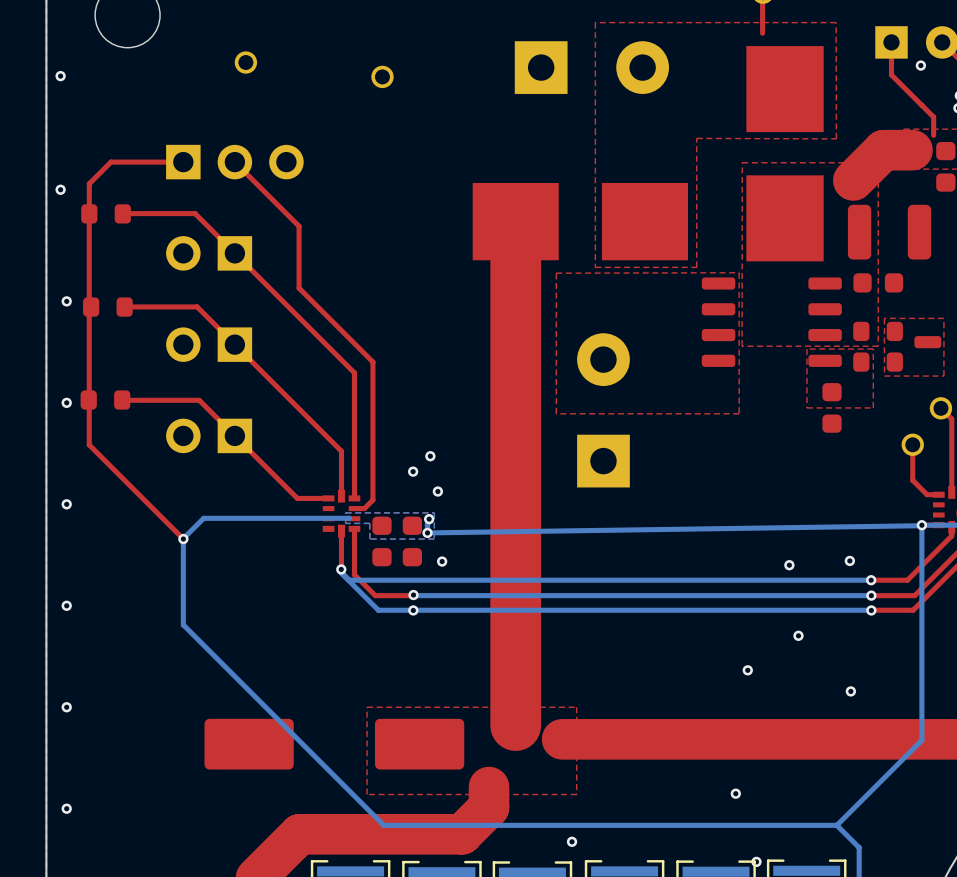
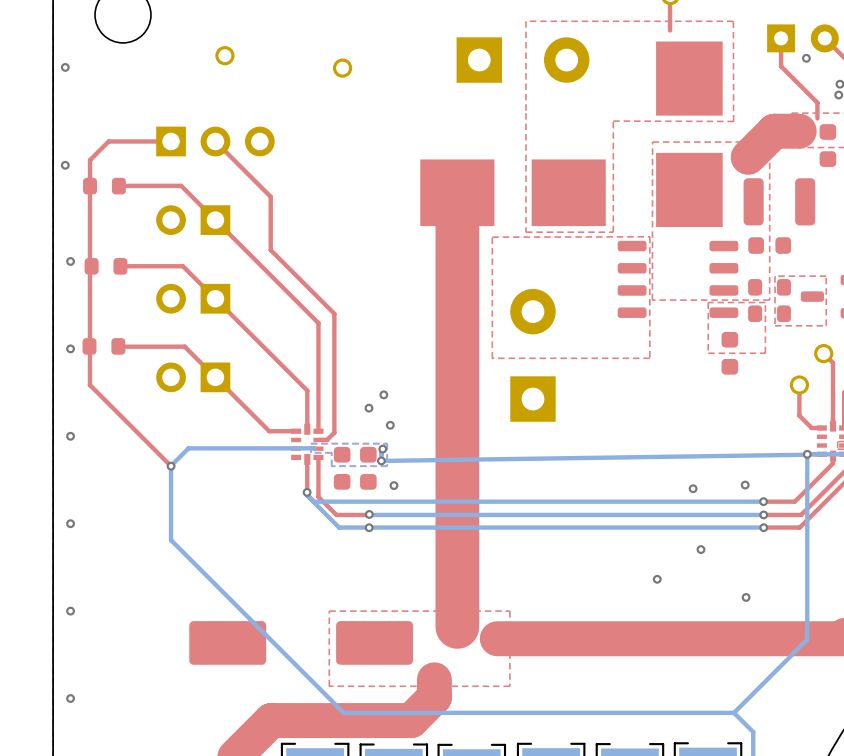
via: (735, 793) -> none
via: (572, 841) -> none
via: (756, 861) -> none

